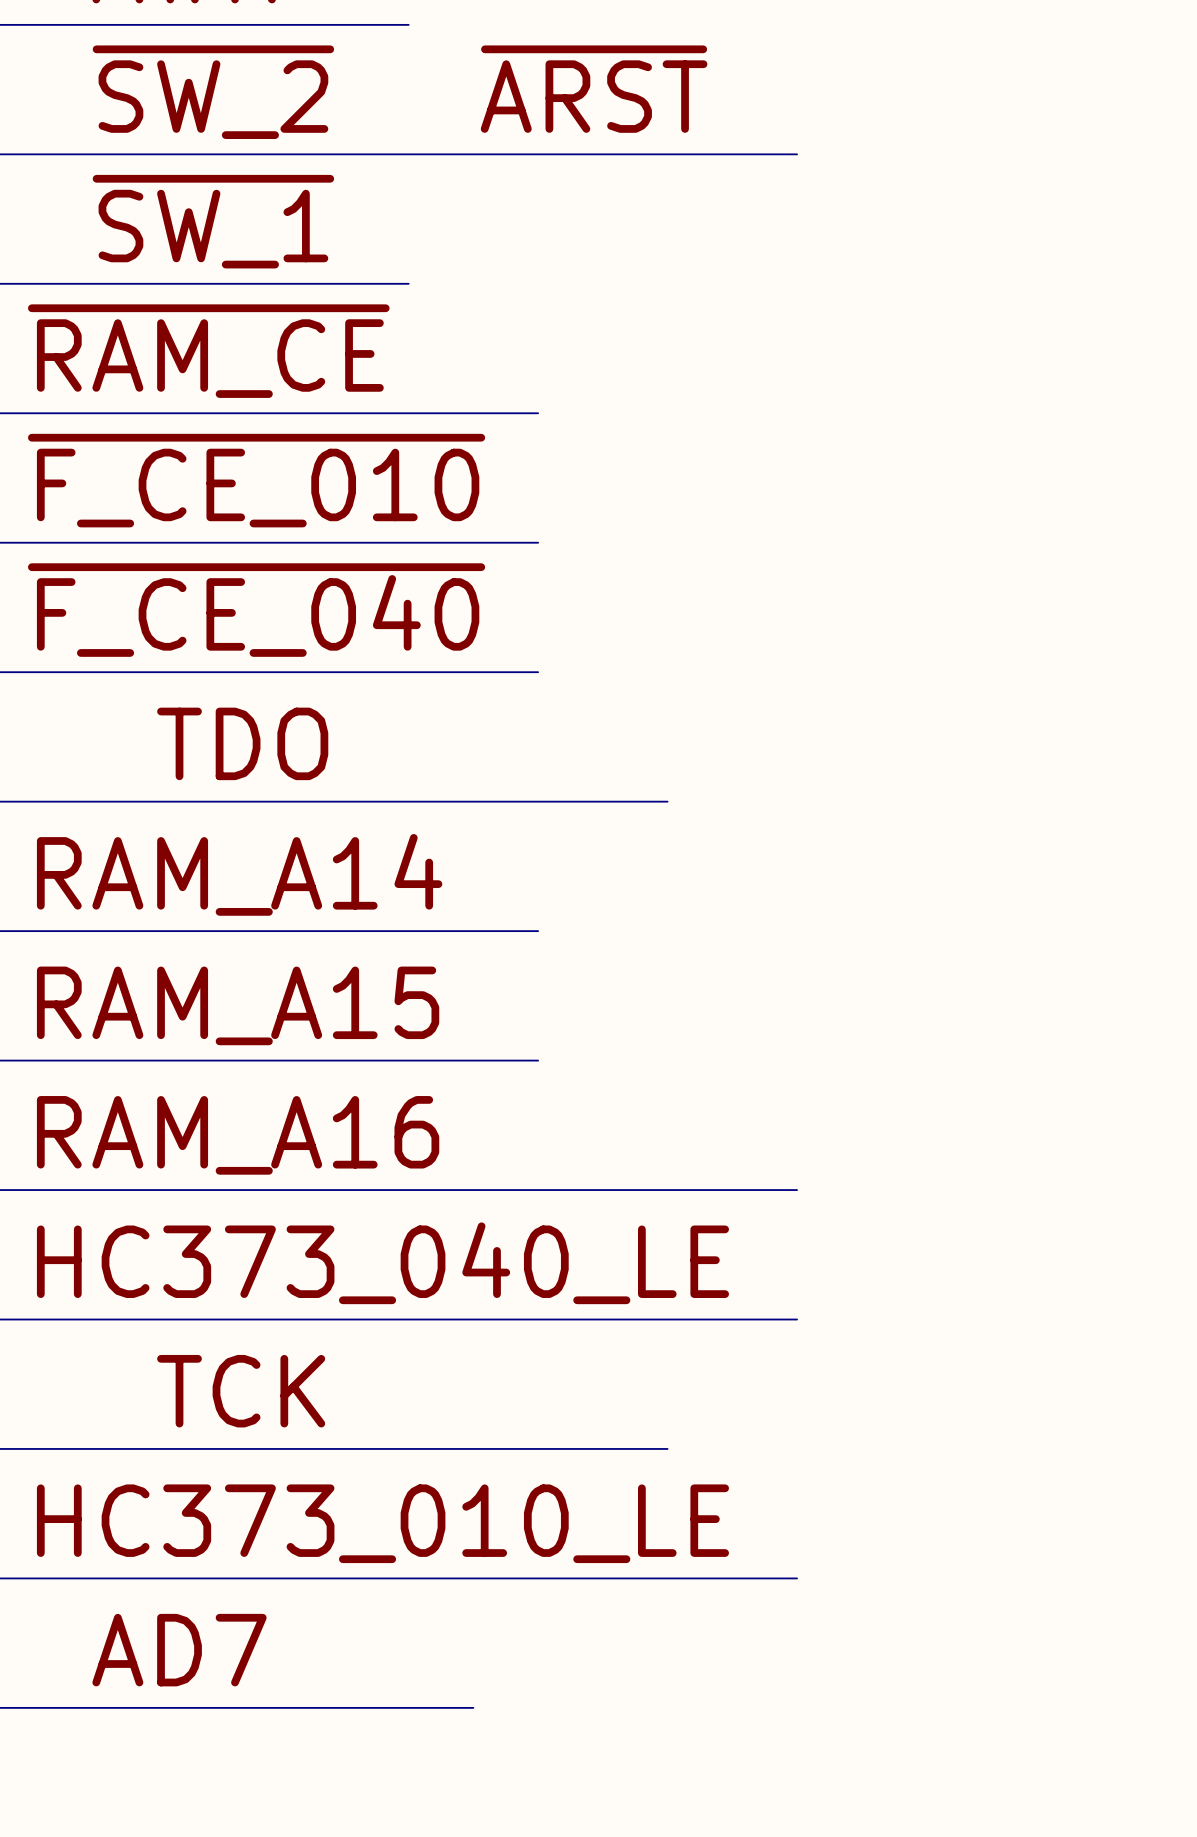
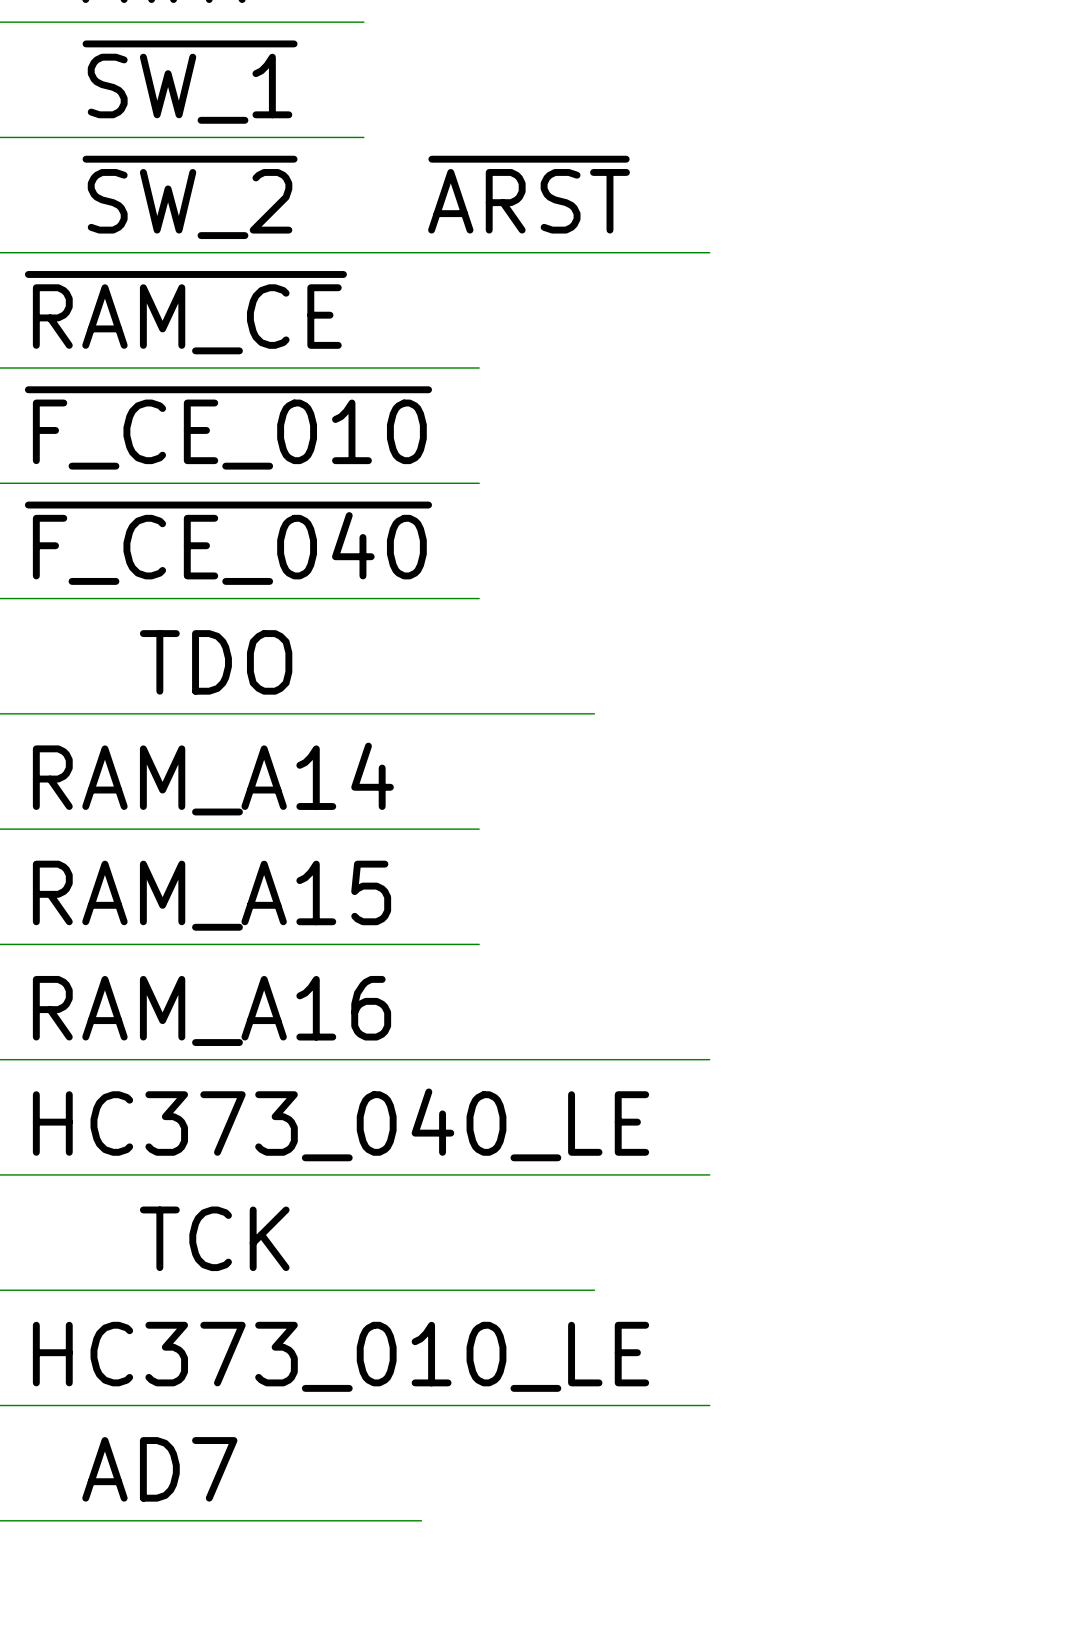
label position: ~{ARST} (594, 89) -> ~{ARST} (529, 194)
label: ~{SW_2} (213, 92) -> ~{SW_1} (190, 82)
wire: (408, 154) (797, 154) -> (363, 252) (709, 252)
label: ~{SW_1} (213, 221) -> ~{SW_2} (190, 197)

